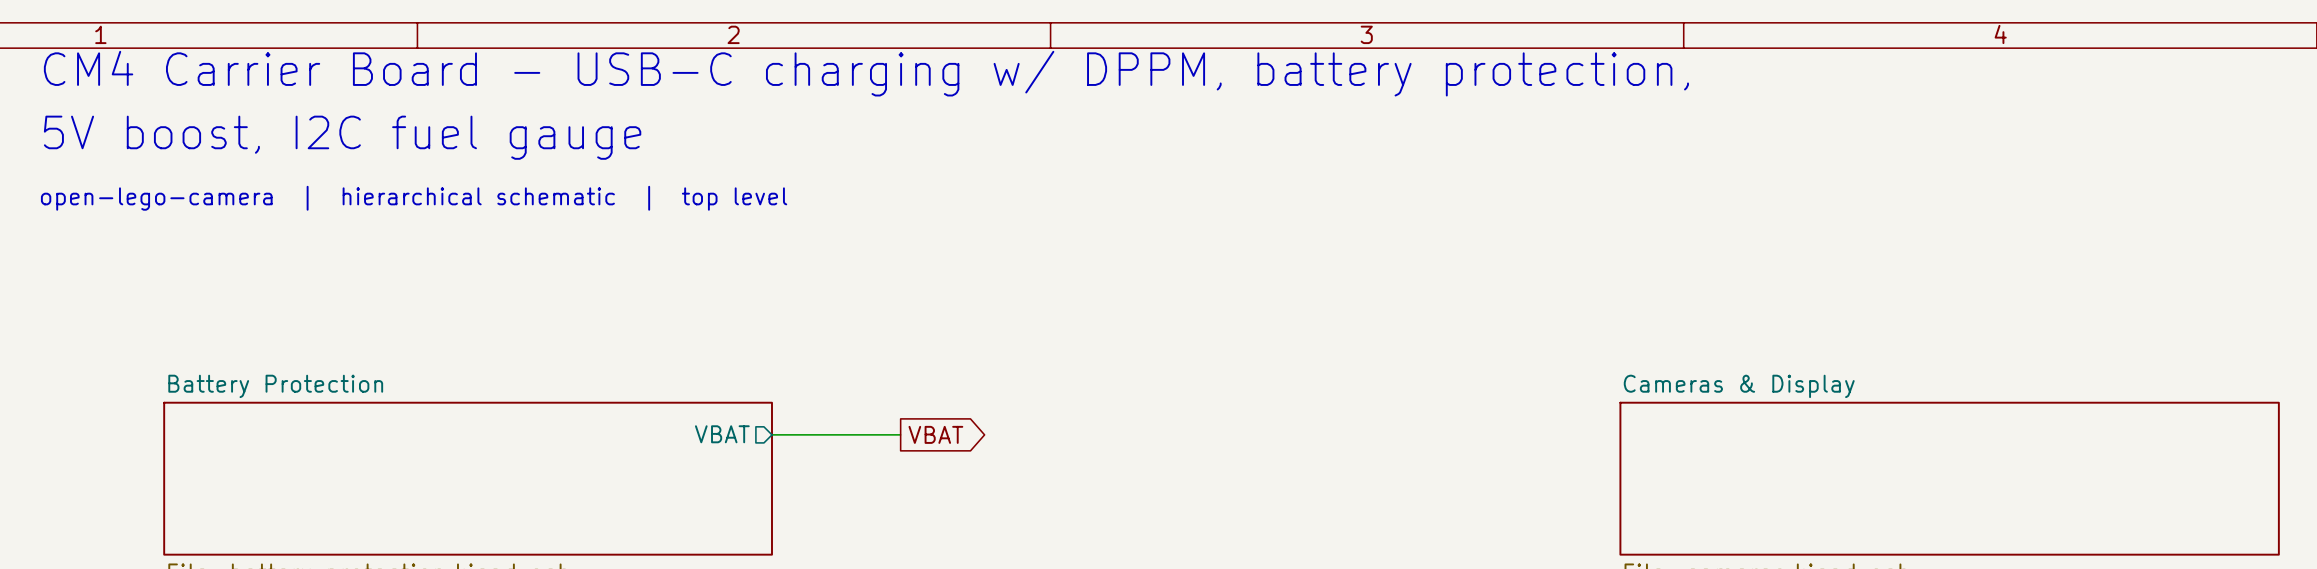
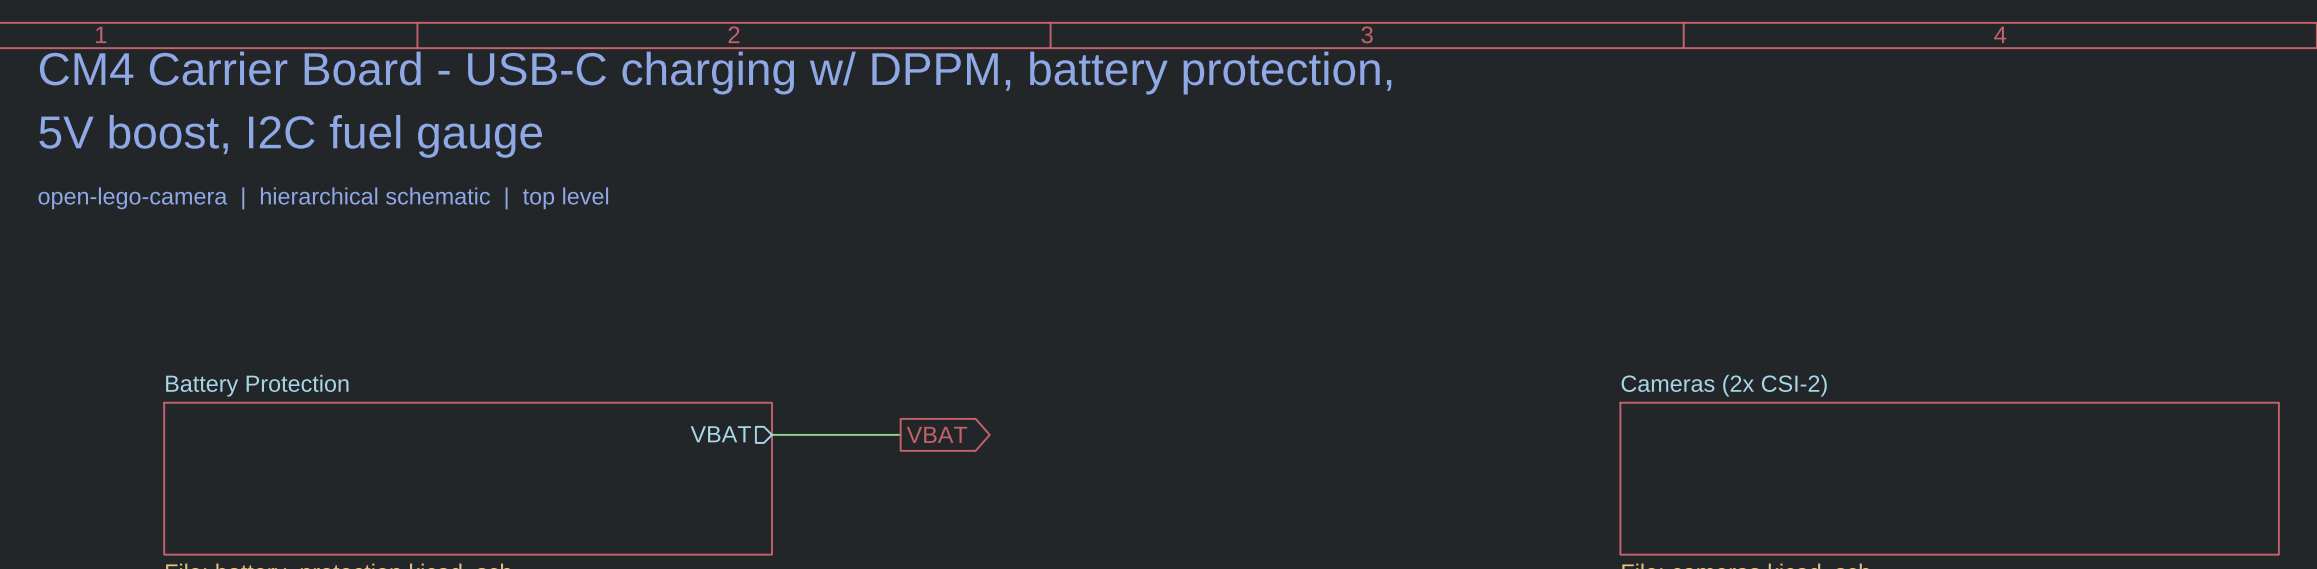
sheet Cameras & Display name: Cameras & Display (1739, 386) -> Cameras (2x CSI-2) (1724, 385)

